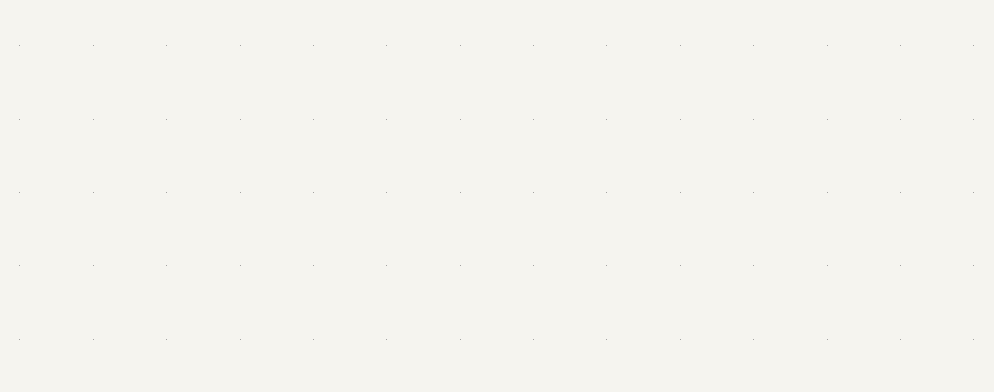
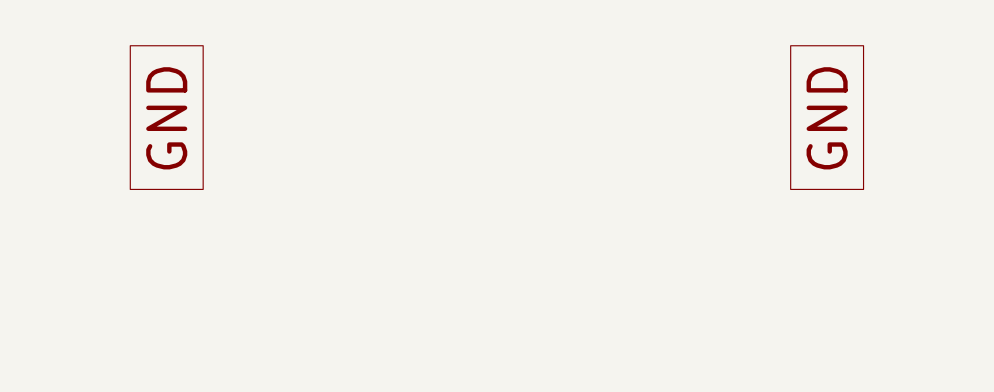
global label: none -> GND (166, 118)
global label: none -> GND (827, 118)

